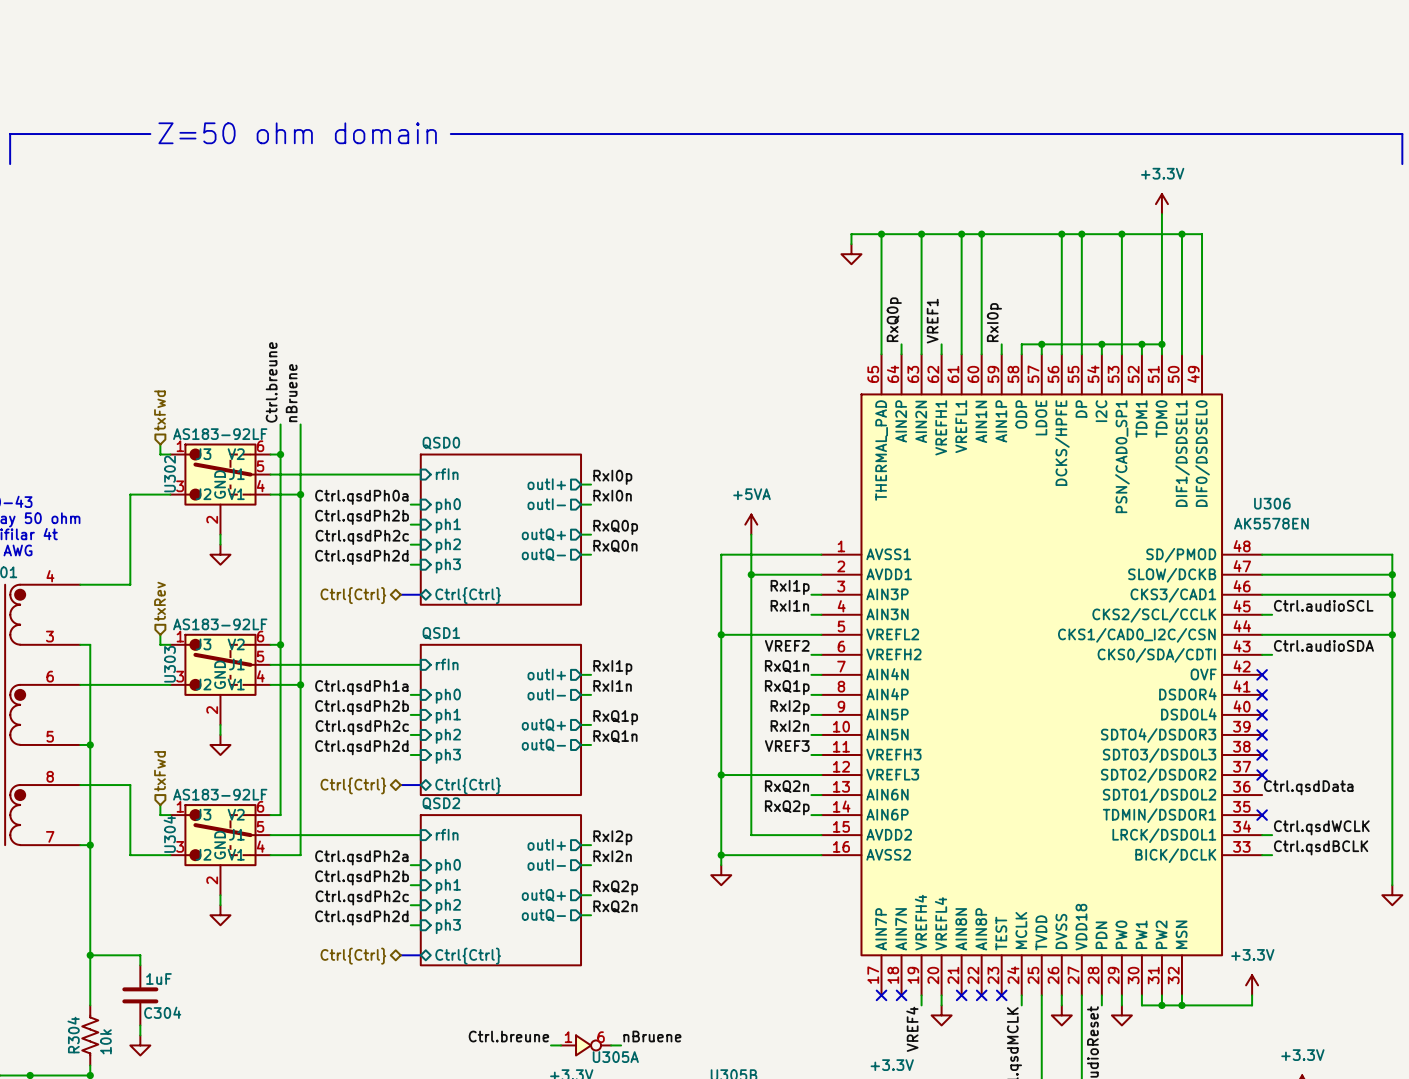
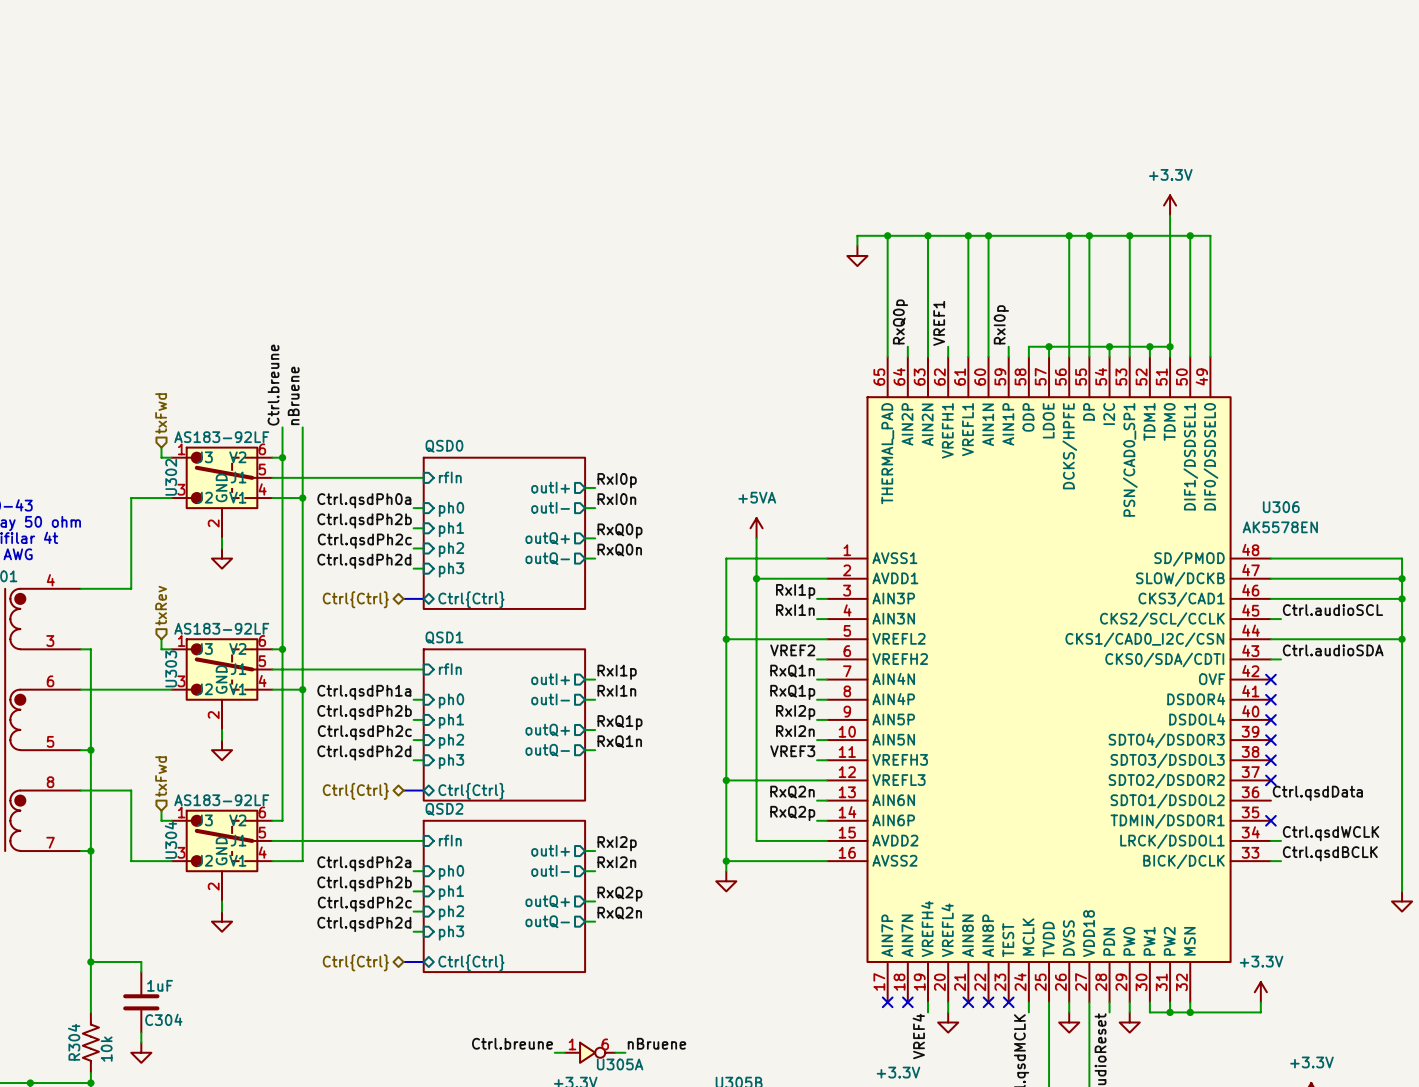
text: Z=50 ohm domain (297, 133) -> none
line: (150, 134) (10, 134) (10, 164) -> none
line: (450, 134) (1402, 134) (1402, 164) -> none

